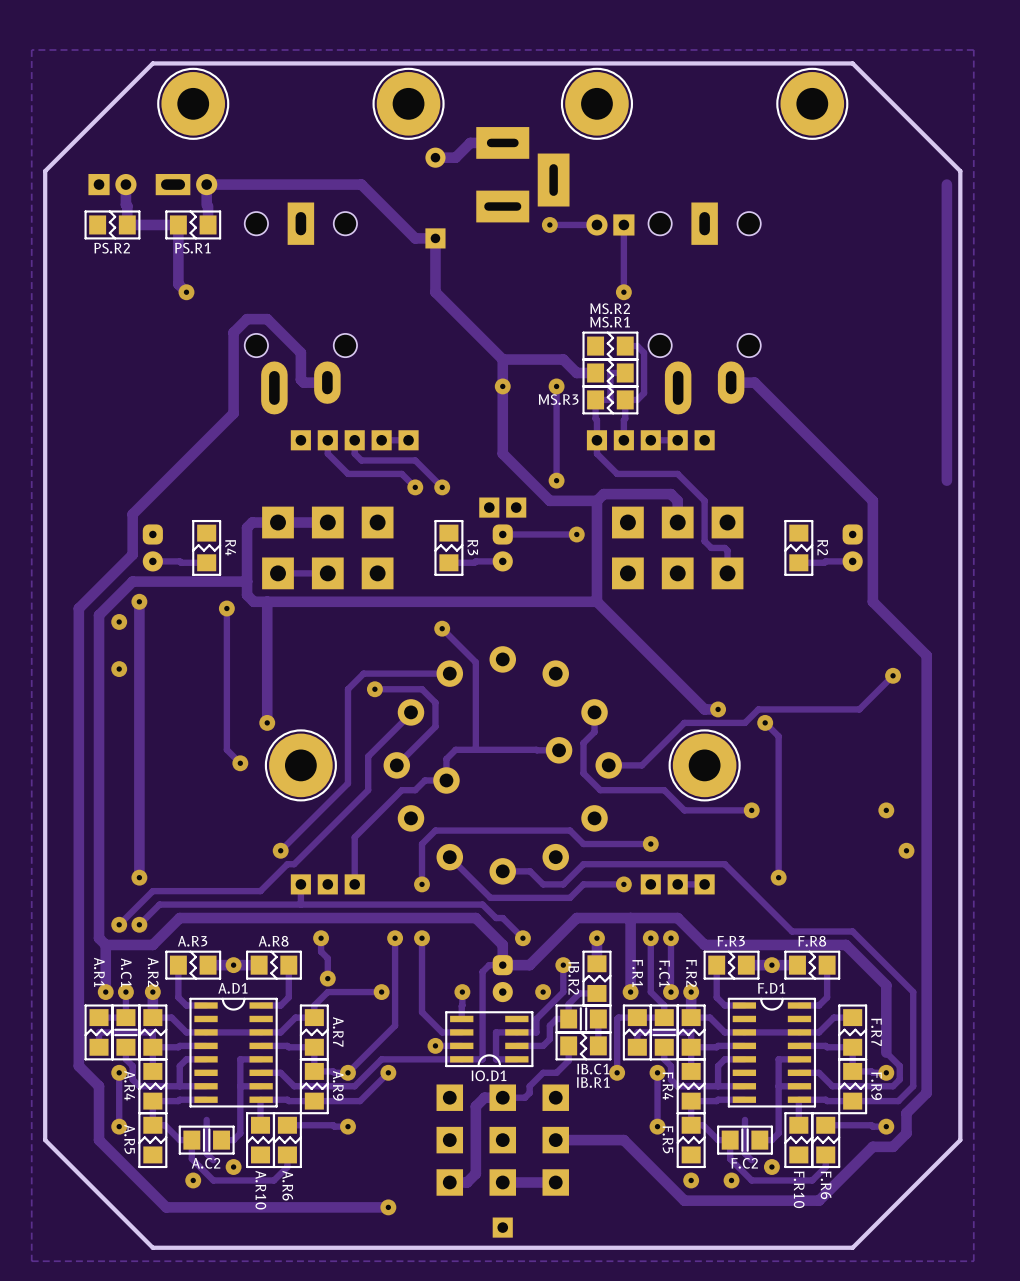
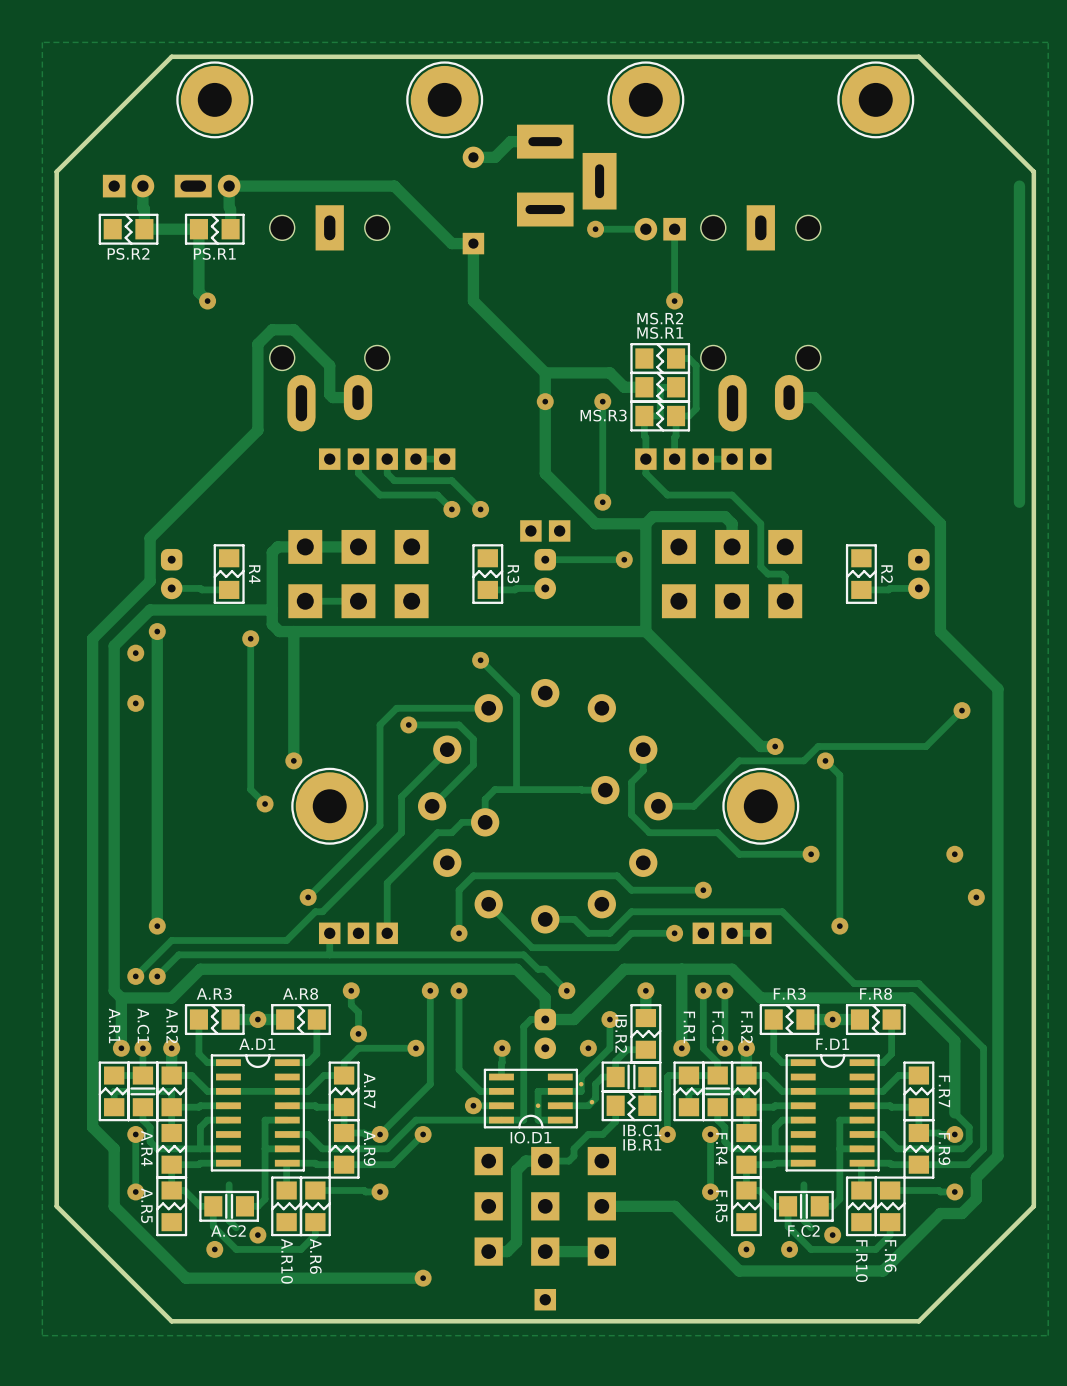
part: none -> (581, 1084)
part: none -> (591, 1102)
part: none -> (538, 1105)

